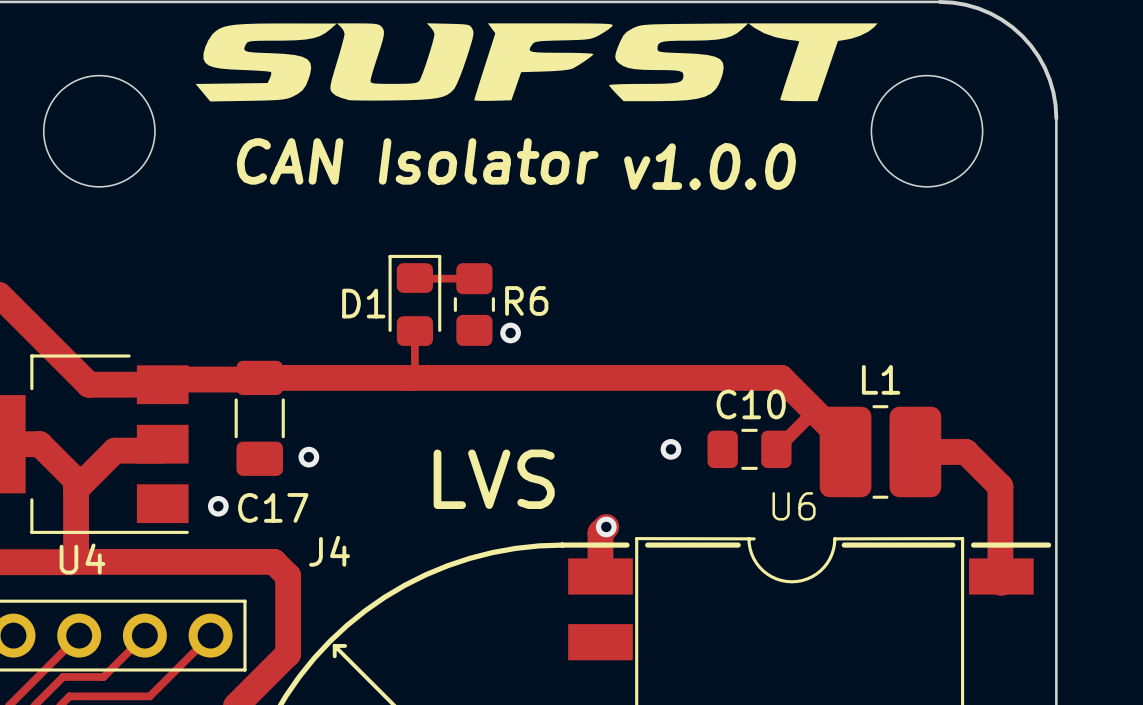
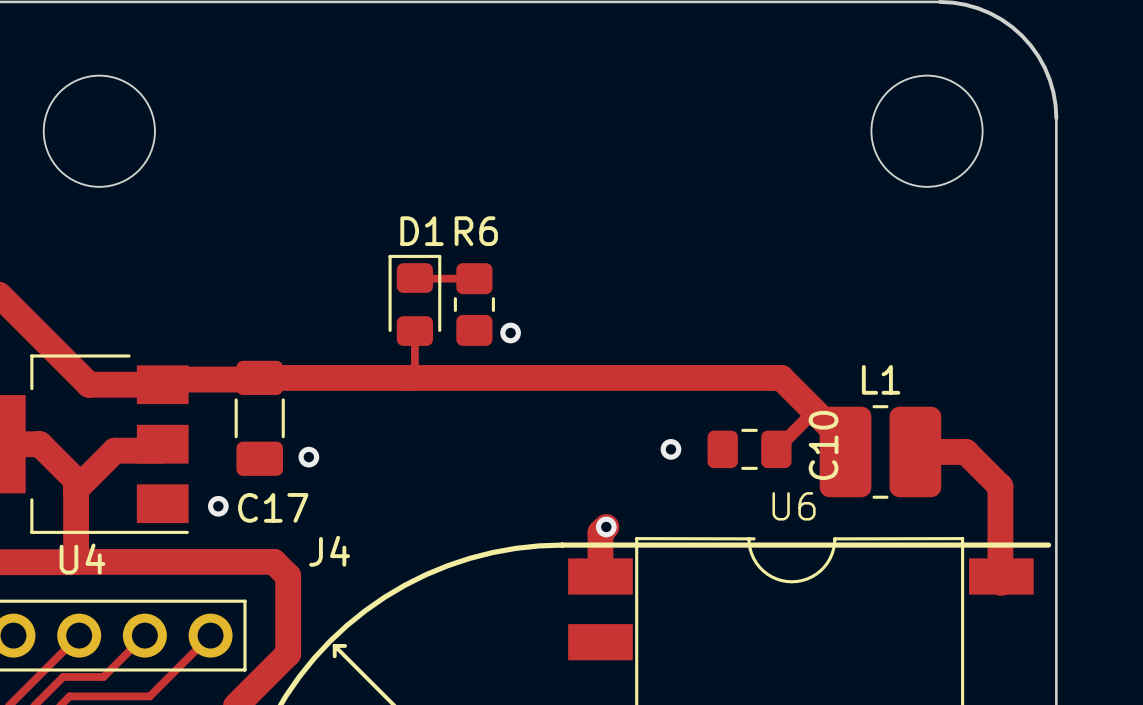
drawing: [195, 23, 878, 102] -> none
text: CAN Isolator (417, 161) -> none
text: v1.0.0 (710, 166) -> none
R6 name position: R6 (526, 300) -> R6 (476, 231)
D1 name position: D1 (363, 303) -> D1 (421, 231)
C10 name rotation: 0° (751, 404) -> 90° counterclockwise (823, 445)
text: LVS (494, 479) -> none
line: none -> (627, 545) (647, 545)
line: none -> (738, 545) (844, 545)
line: none -> (952, 545) (973, 545)

